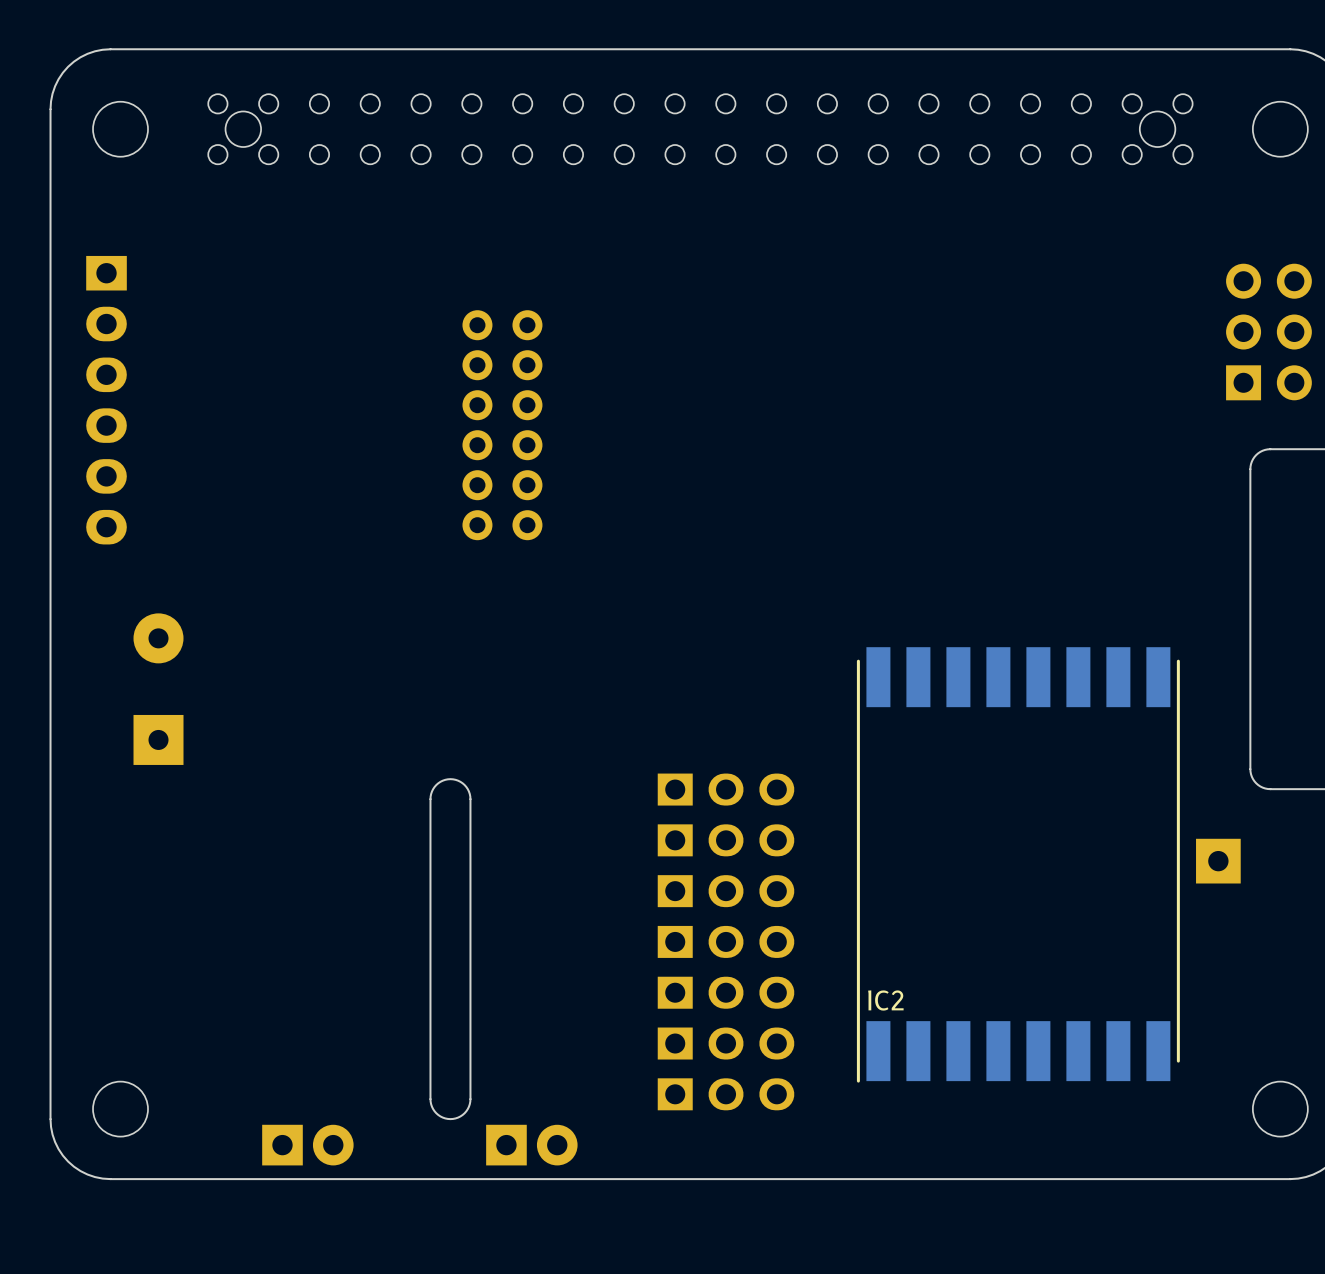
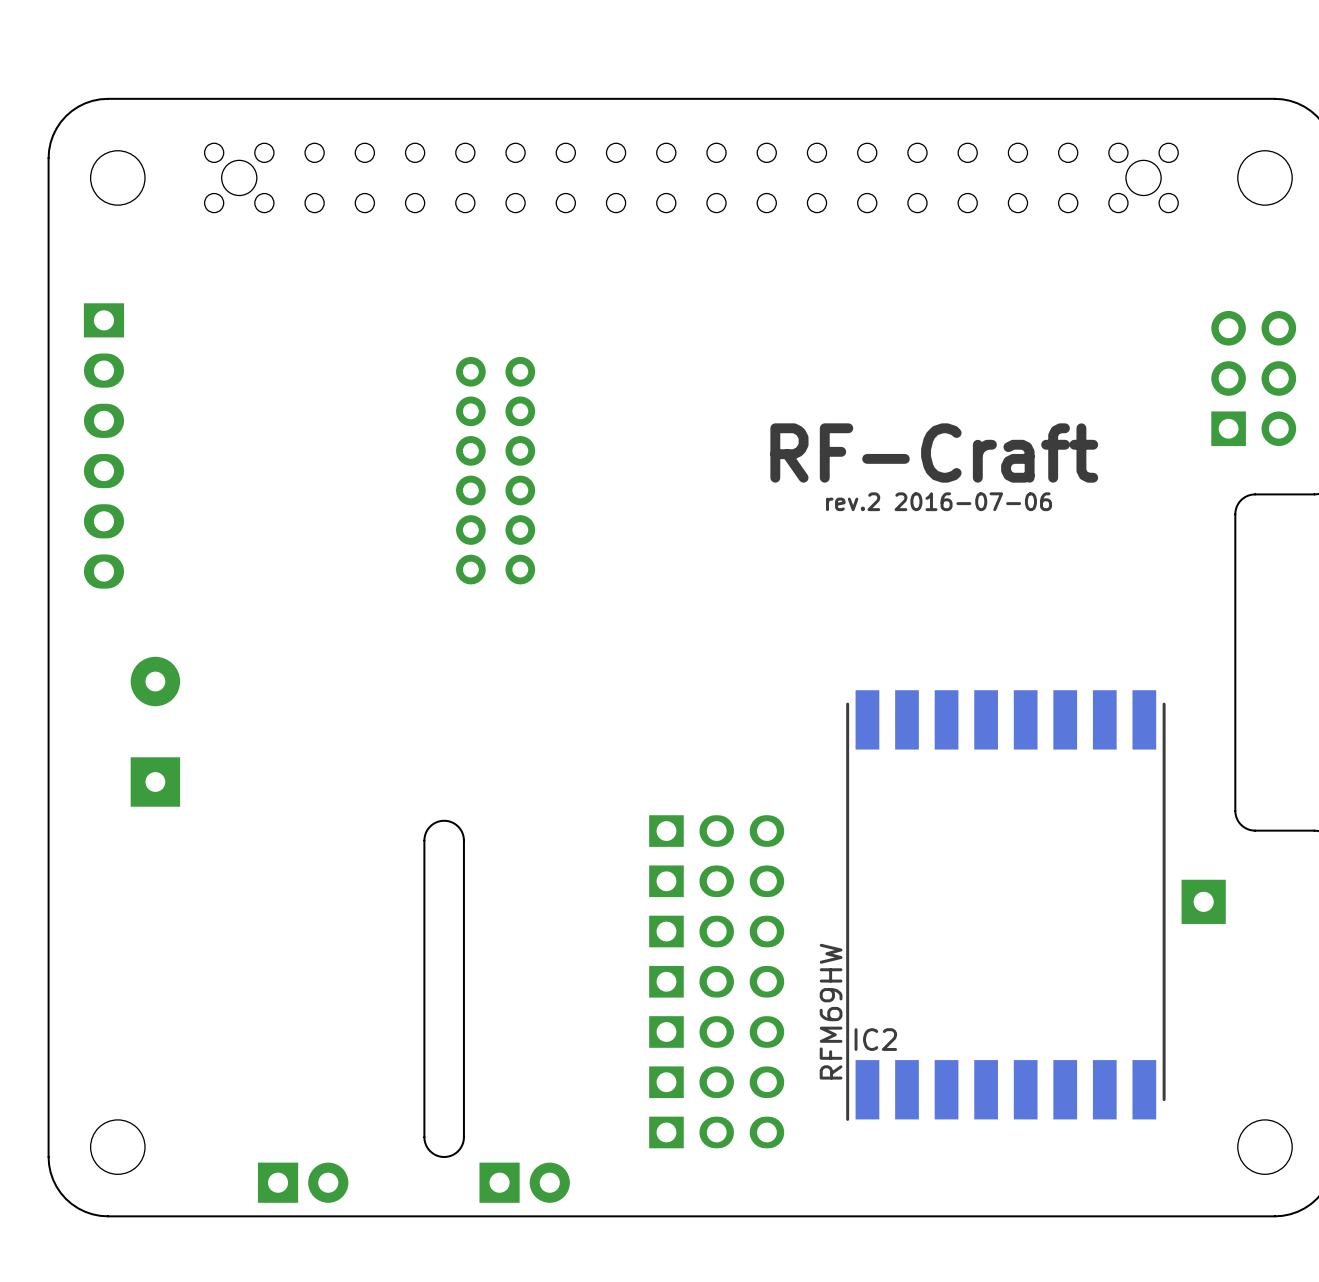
text: none -> RF-Craft (934, 453)
text: none -> rev.2 2016-07-06 (939, 501)
text: none -> RFM69HW (831, 1011)

